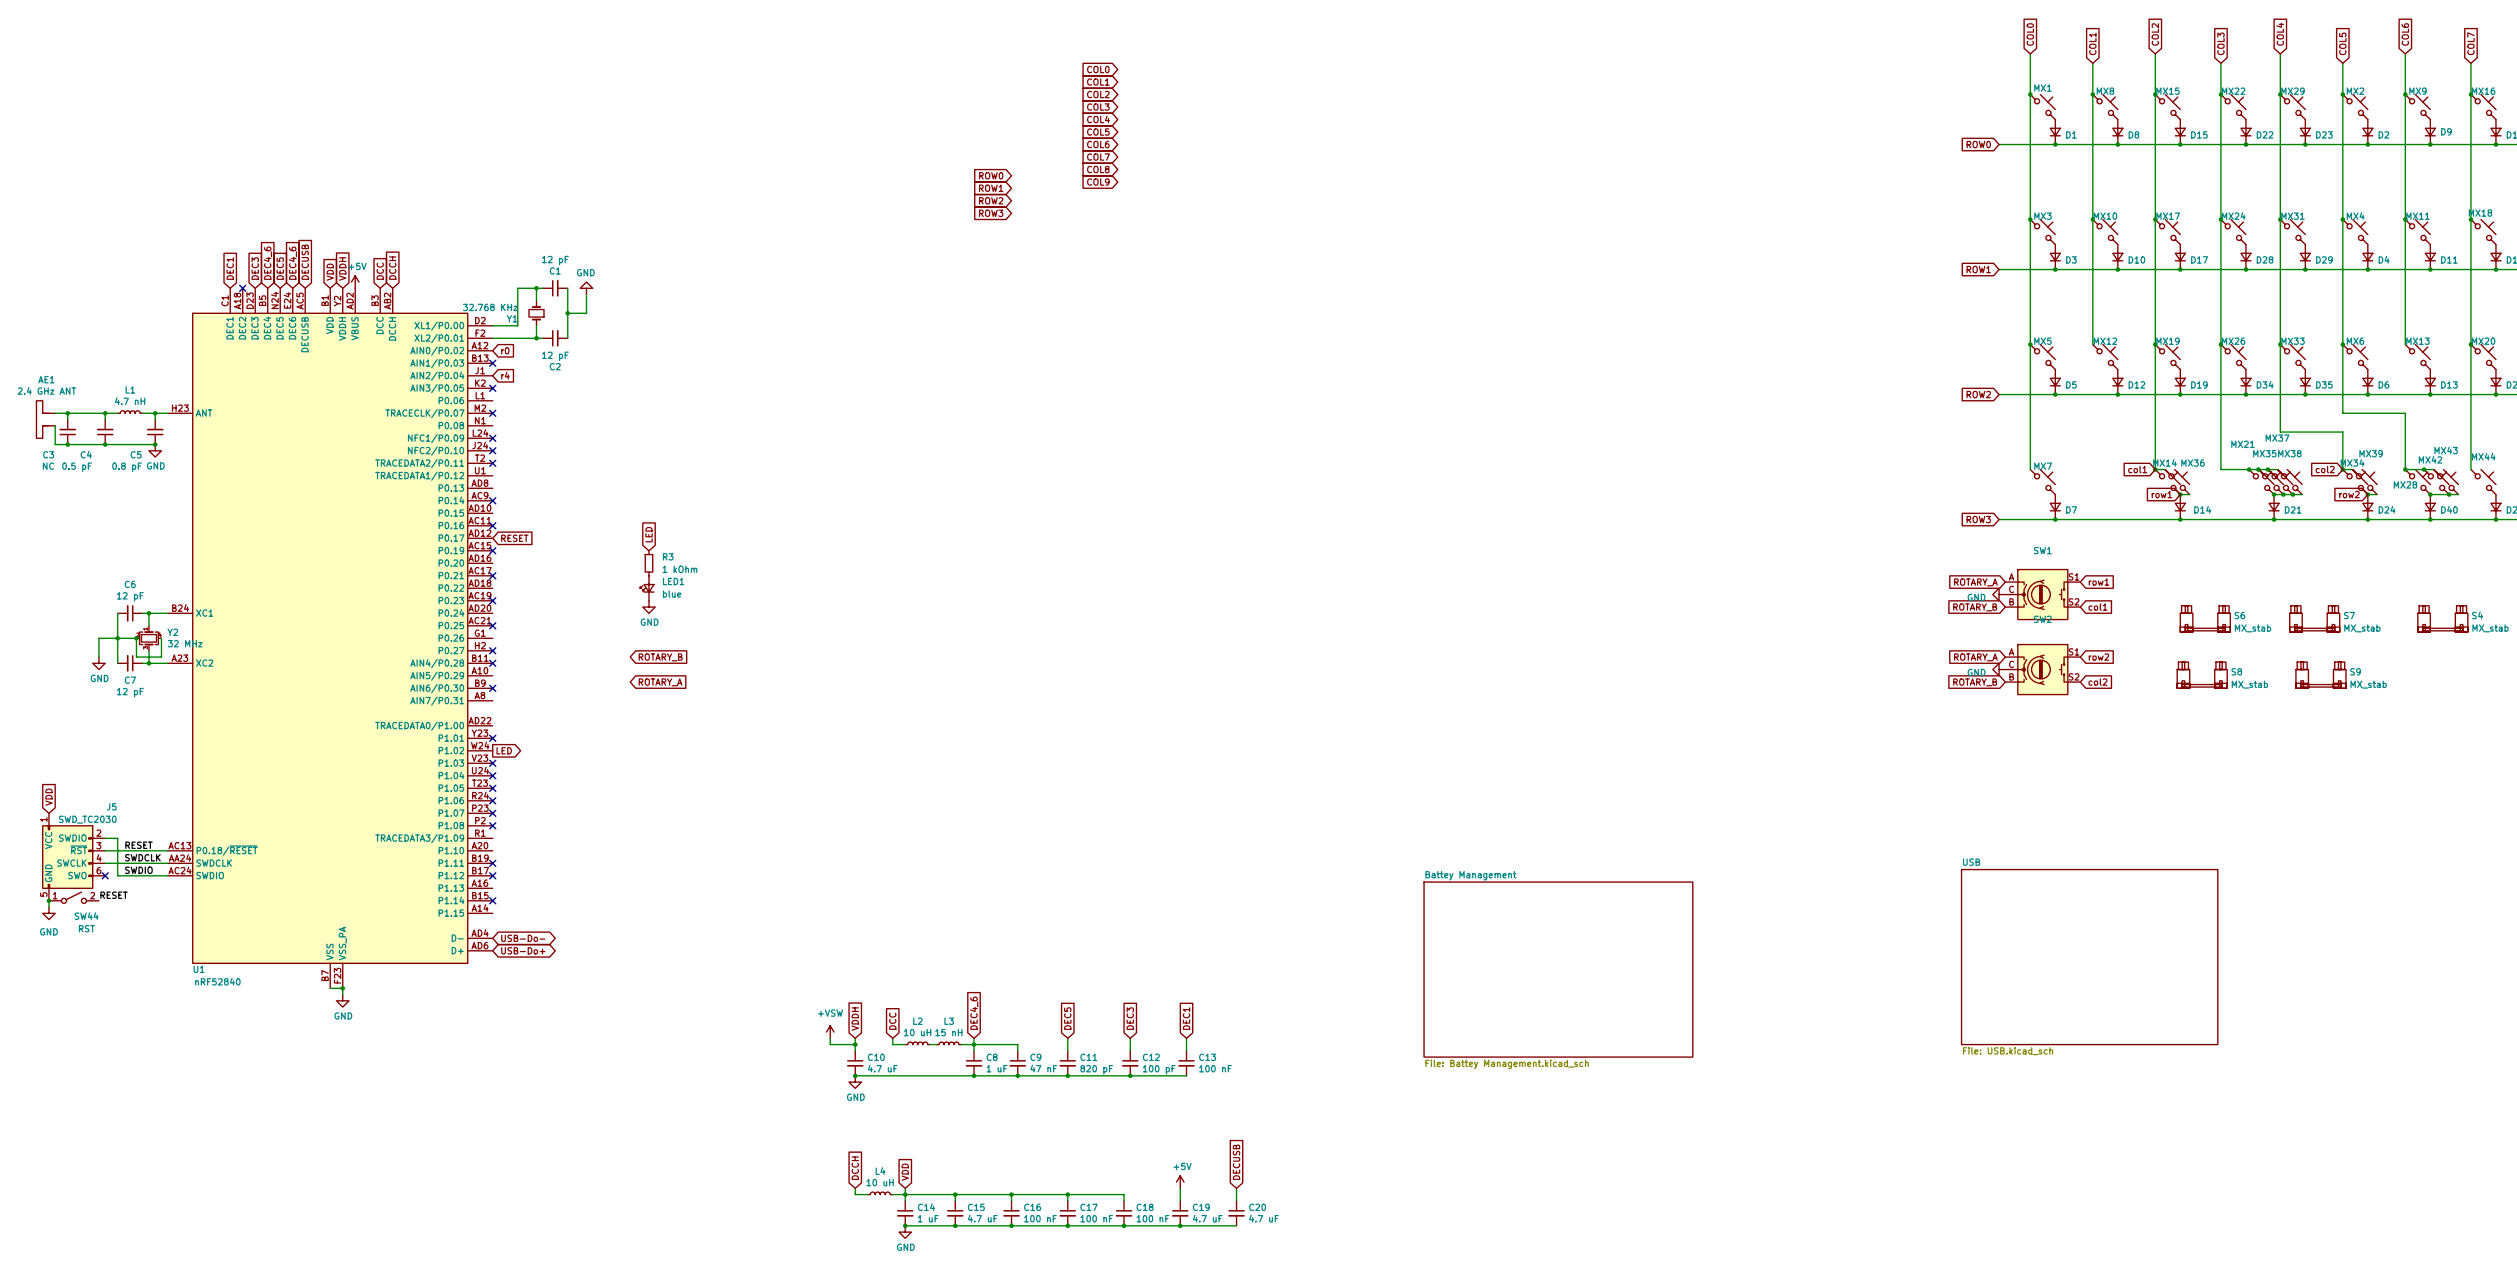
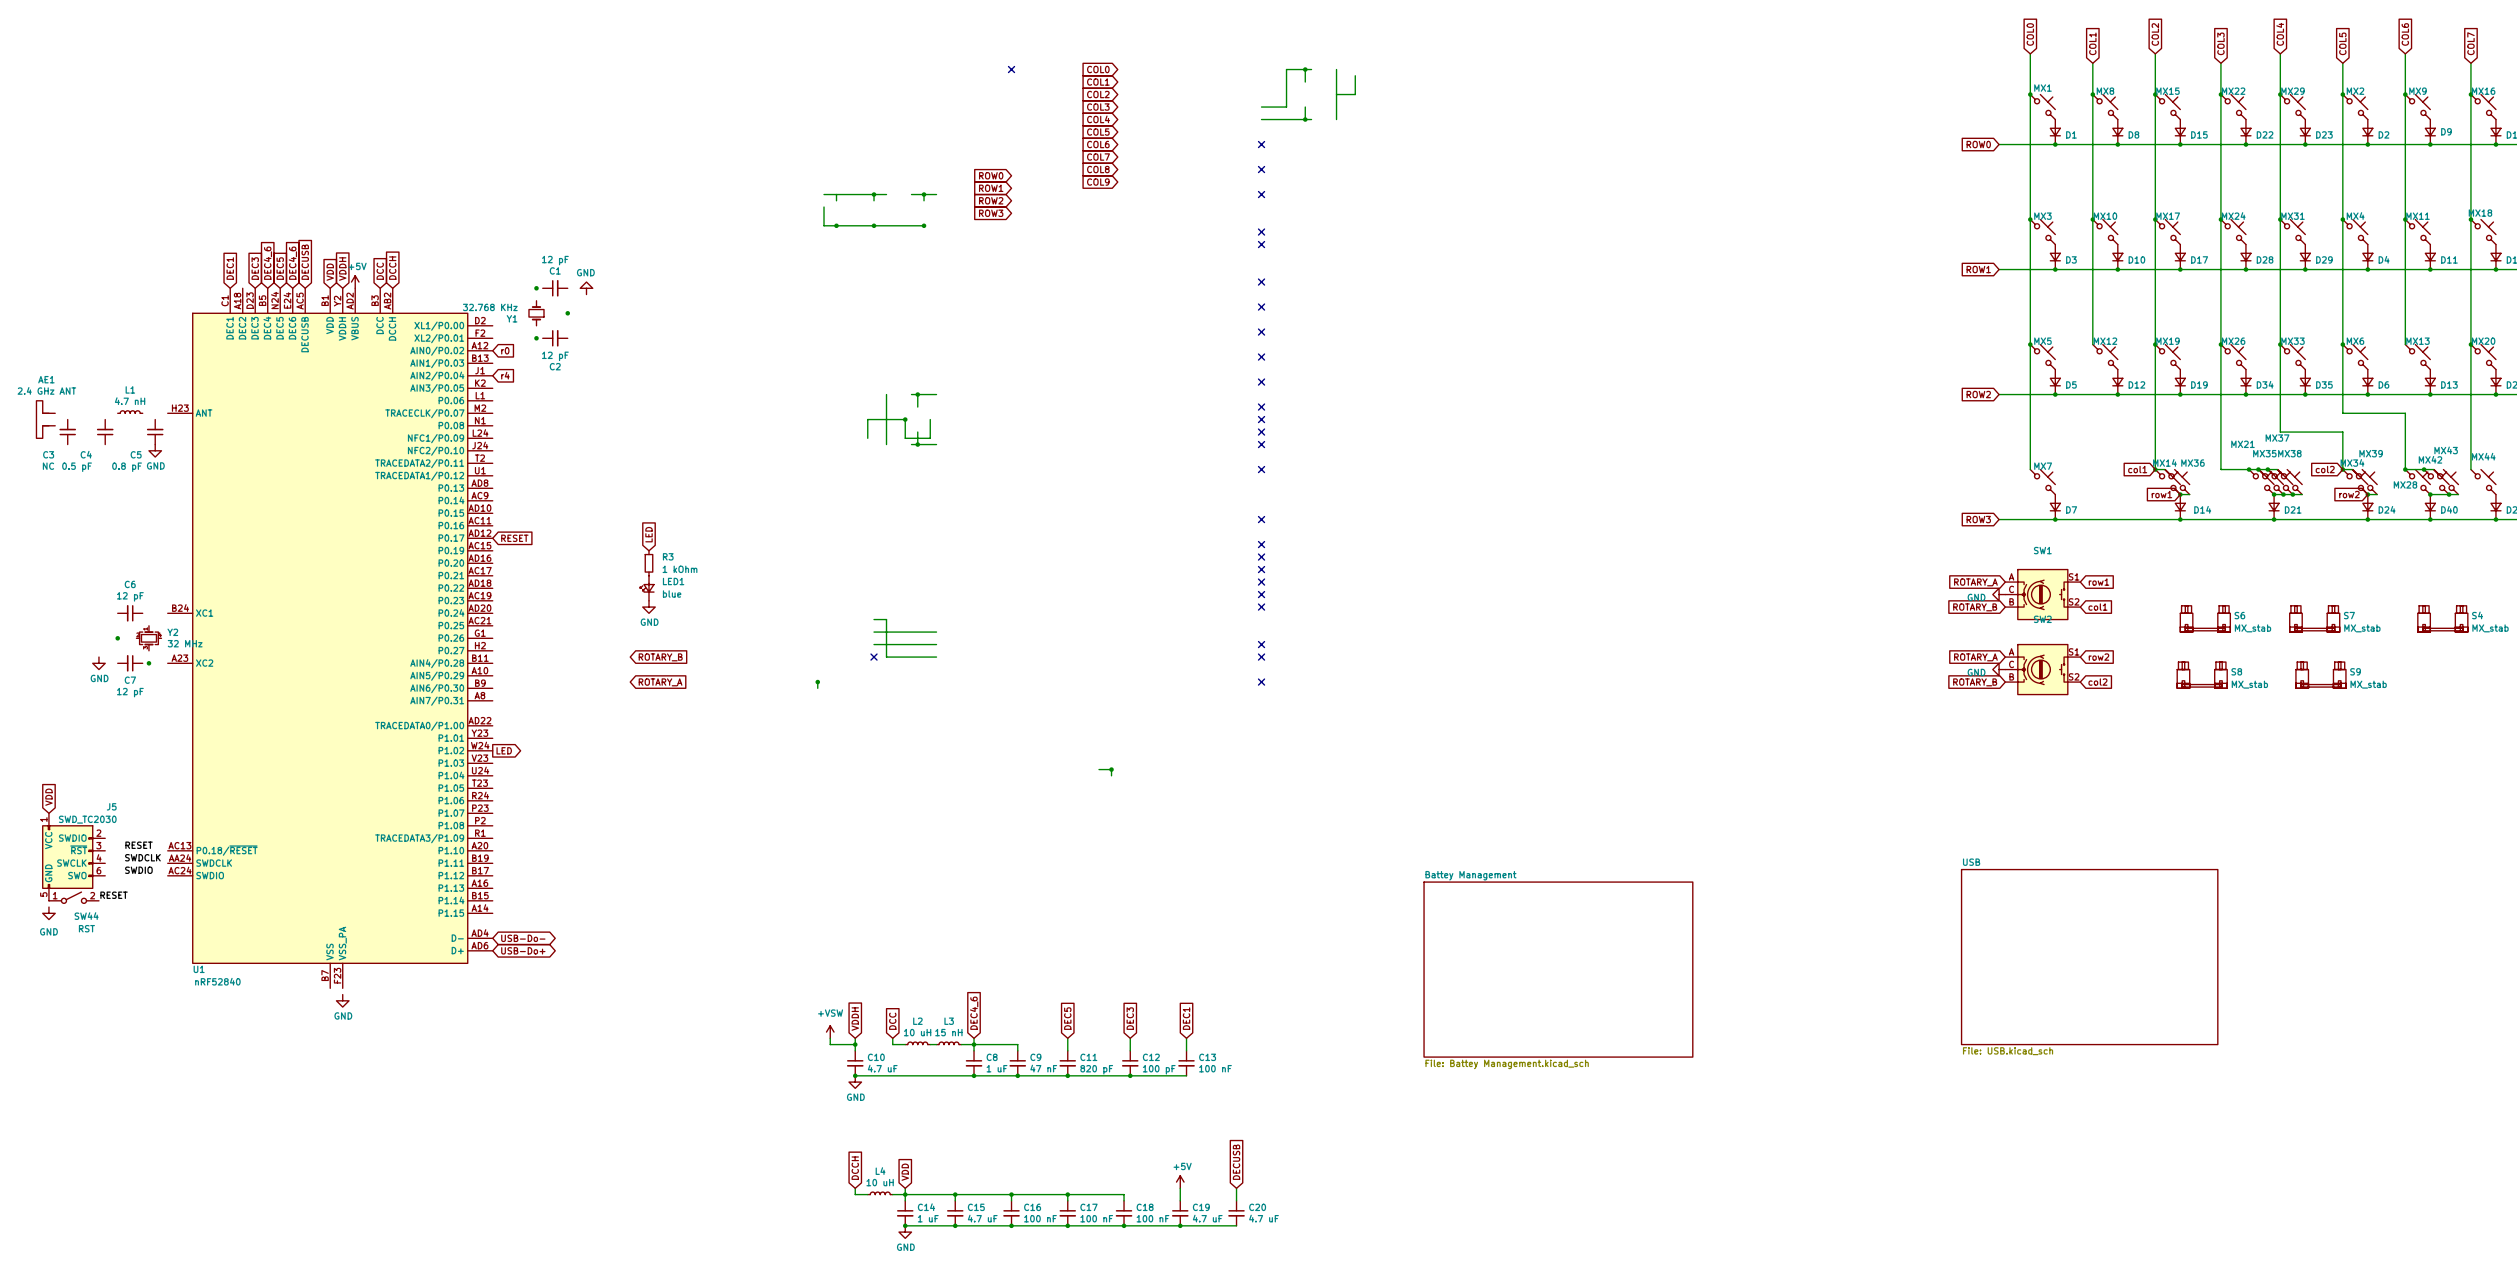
no-connect mark: none -> (1011, 69)
wire: none -> (1305, 69) (1305, 82)
junction: none -> (1305, 69)
wire: none -> (1311, 69) (1286, 69) (1286, 107) (1261, 107)
wire: none -> (1336, 69) (1336, 119)
wire: none -> (1355, 75) (1355, 94) (1336, 94)
wire: none -> (1305, 107) (1305, 119)
wire: none -> (1261, 119) (1311, 119)
junction: none -> (1305, 119)
no-connect mark: none -> (1261, 144)
no-connect mark: none -> (1261, 169)
wire: none -> (824, 194) (886, 194)
wire: none -> (836, 194) (836, 200)
wire: none -> (874, 194) (874, 200)
junction: none -> (874, 194)
wire: none -> (911, 194) (936, 194)
wire: none -> (924, 194) (924, 200)
junction: none -> (924, 194)
no-connect mark: none -> (1261, 194)
wire: none -> (824, 207) (824, 225) (924, 225)
junction: none -> (836, 225)
junction: none -> (874, 225)
junction: none -> (924, 225)
no-connect mark: none -> (1261, 232)
no-connect mark: none -> (1261, 244)
no-connect mark: none -> (1261, 282)
no-connect mark: (242, 288) -> none
wire: (536, 288) (536, 300) -> none
wire: (542, 288) (517, 288) (517, 325) (492, 325) -> none
wire: (567, 288) (567, 338) -> none
wire: (586, 294) (586, 313) (567, 313) -> none
no-connect mark: none -> (1261, 307)
wire: (536, 325) (536, 338) -> none
no-connect mark: none -> (1261, 332)
wire: (492, 338) (542, 338) -> none
no-connect mark: none -> (1261, 357)
no-connect mark: (492, 363) -> none
no-connect mark: none -> (1261, 382)
no-connect mark: (492, 388) -> none
wire: none -> (886, 394) (886, 444)
wire: none -> (911, 394) (936, 394)
wire: none -> (917, 394) (917, 407)
junction: none -> (917, 394)
no-connect mark: none -> (1261, 407)
wire: (55, 413) (117, 413) -> none
wire: (67, 413) (67, 419) -> none
junction: (67, 413) -> none
wire: (105, 413) (105, 419) -> none
junction: (105, 413) -> none
wire: (142, 413) (167, 413) -> none
wire: (155, 413) (155, 419) -> none
junction: (155, 413) -> none
no-connect mark: (492, 413) -> none
junction: none -> (905, 419)
wire: none -> (930, 419) (930, 438) (905, 438) (905, 419) (867, 419) (867, 438)
no-connect mark: none -> (1261, 419)
wire: (55, 425) (55, 444) (155, 444) -> none
wire: none -> (917, 432) (917, 444)
no-connect mark: none -> (1261, 432)
no-connect mark: (492, 438) -> none
junction: (67, 444) -> none
junction: (105, 444) -> none
junction: (155, 444) -> none
wire: none -> (911, 444) (936, 444)
junction: none -> (917, 444)
no-connect mark: none -> (1261, 444)
no-connect mark: (492, 450) -> none
no-connect mark: (492, 463) -> none
no-connect mark: none -> (1261, 469)
no-connect mark: (492, 500) -> none
no-connect mark: none -> (1261, 519)
no-connect mark: (492, 525) -> none
no-connect mark: none -> (1261, 544)
no-connect mark: (492, 550) -> none
no-connect mark: none -> (1261, 557)
no-connect mark: none -> (1261, 569)
no-connect mark: (492, 575) -> none
no-connect mark: none -> (1261, 582)
no-connect mark: none -> (1261, 594)
no-connect mark: (492, 600) -> none
no-connect mark: none -> (1261, 607)
wire: (117, 613) (117, 663) -> none
wire: (142, 613) (167, 613) -> none
wire: (148, 613) (148, 625) -> none
junction: (148, 613) -> none
wire: none -> (874, 619) (886, 619) (886, 657) (936, 657)
no-connect mark: (492, 625) -> none
wire: none -> (874, 632) (936, 632)
junction: (136, 638) -> none
wire: (161, 638) (161, 657) (136, 657) (136, 638) (98, 638) (98, 657) -> none
wire: none -> (874, 644) (936, 644)
no-connect mark: none -> (1261, 644)
wire: (148, 650) (148, 663) -> none
no-connect mark: (492, 650) -> none
no-connect mark: none -> (874, 657)
no-connect mark: none -> (1261, 657)
wire: (142, 663) (167, 663) -> none
no-connect mark: (492, 663) -> none
wire: none -> (817, 682) (817, 688)
junction: none -> (817, 682)
no-connect mark: none -> (1261, 682)
no-connect mark: (492, 688) -> none
no-connect mark: (492, 738) -> none
no-connect mark: (492, 763) -> none
wire: none -> (1099, 769) (1111, 769) (1111, 775)
junction: none -> (1111, 769)
no-connect mark: (492, 775) -> none
no-connect mark: (492, 788) -> none
no-connect mark: (492, 800) -> none
no-connect mark: (492, 813) -> none
no-connect mark: (492, 825) -> none
wire: (105, 838) (117, 838) (117, 875) (167, 875) -> none
wire: (105, 850) (167, 850) -> none
wire: (105, 863) (167, 863) -> none
no-connect mark: (492, 863) -> none
no-connect mark: (105, 875) -> none
no-connect mark: (492, 875) -> none
wire: (48, 900) (48, 907) -> none
junction: (48, 900) -> none
no-connect mark: (492, 900) -> none
wire: (330, 988) (342, 988) (342, 994) -> none
junction: (342, 988) -> none

